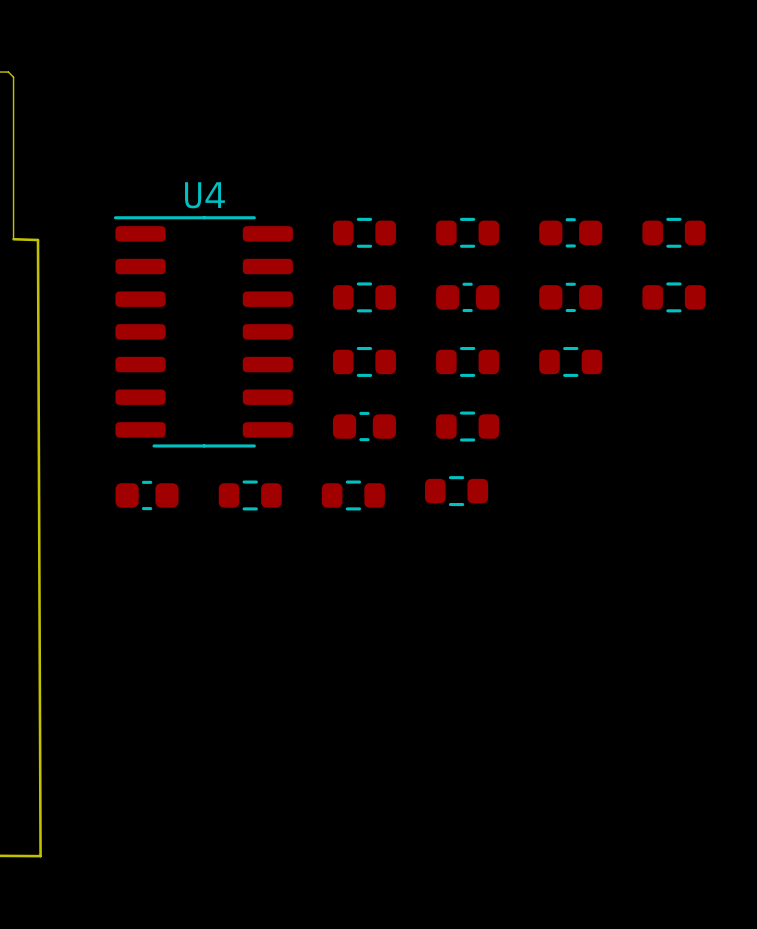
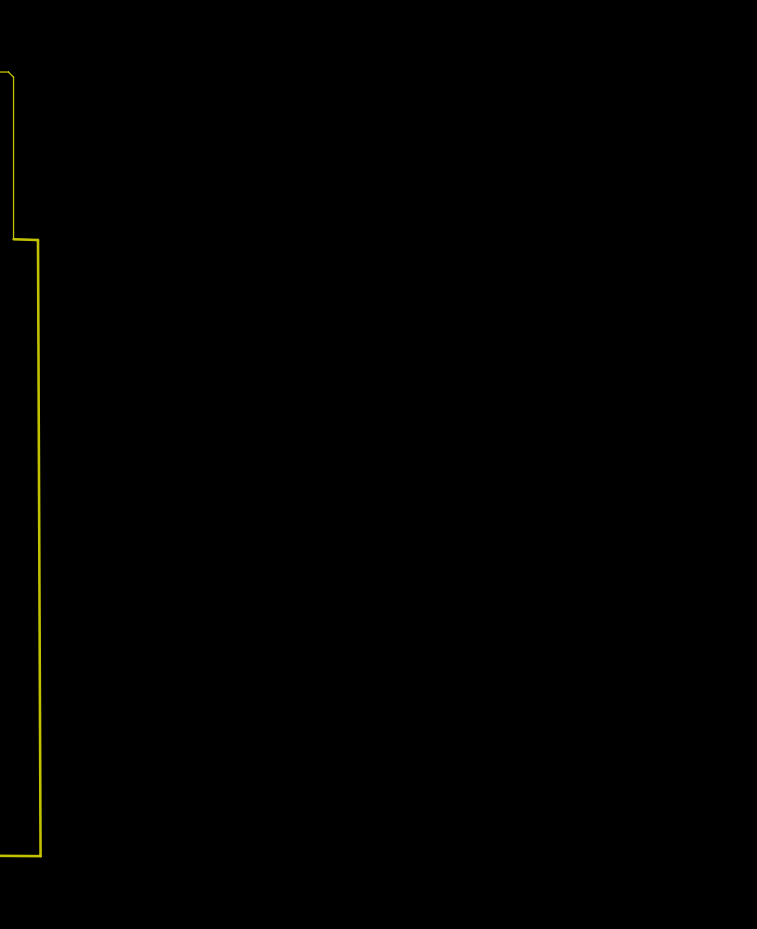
part: (364, 232) -> none
part: (467, 232) -> none
part: (570, 232) -> none
part: (673, 232) -> none
part: (364, 297) -> none
part: (467, 297) -> none
part: (570, 297) -> none
part: (673, 297) -> none
U4: (203, 331) -> none
part: (364, 361) -> none
part: (467, 361) -> none
part: (570, 361) -> none
part: (364, 426) -> none
part: (467, 426) -> none
part: (456, 491) -> none
part: (147, 495) -> none
part: (250, 495) -> none
part: (353, 495) -> none

